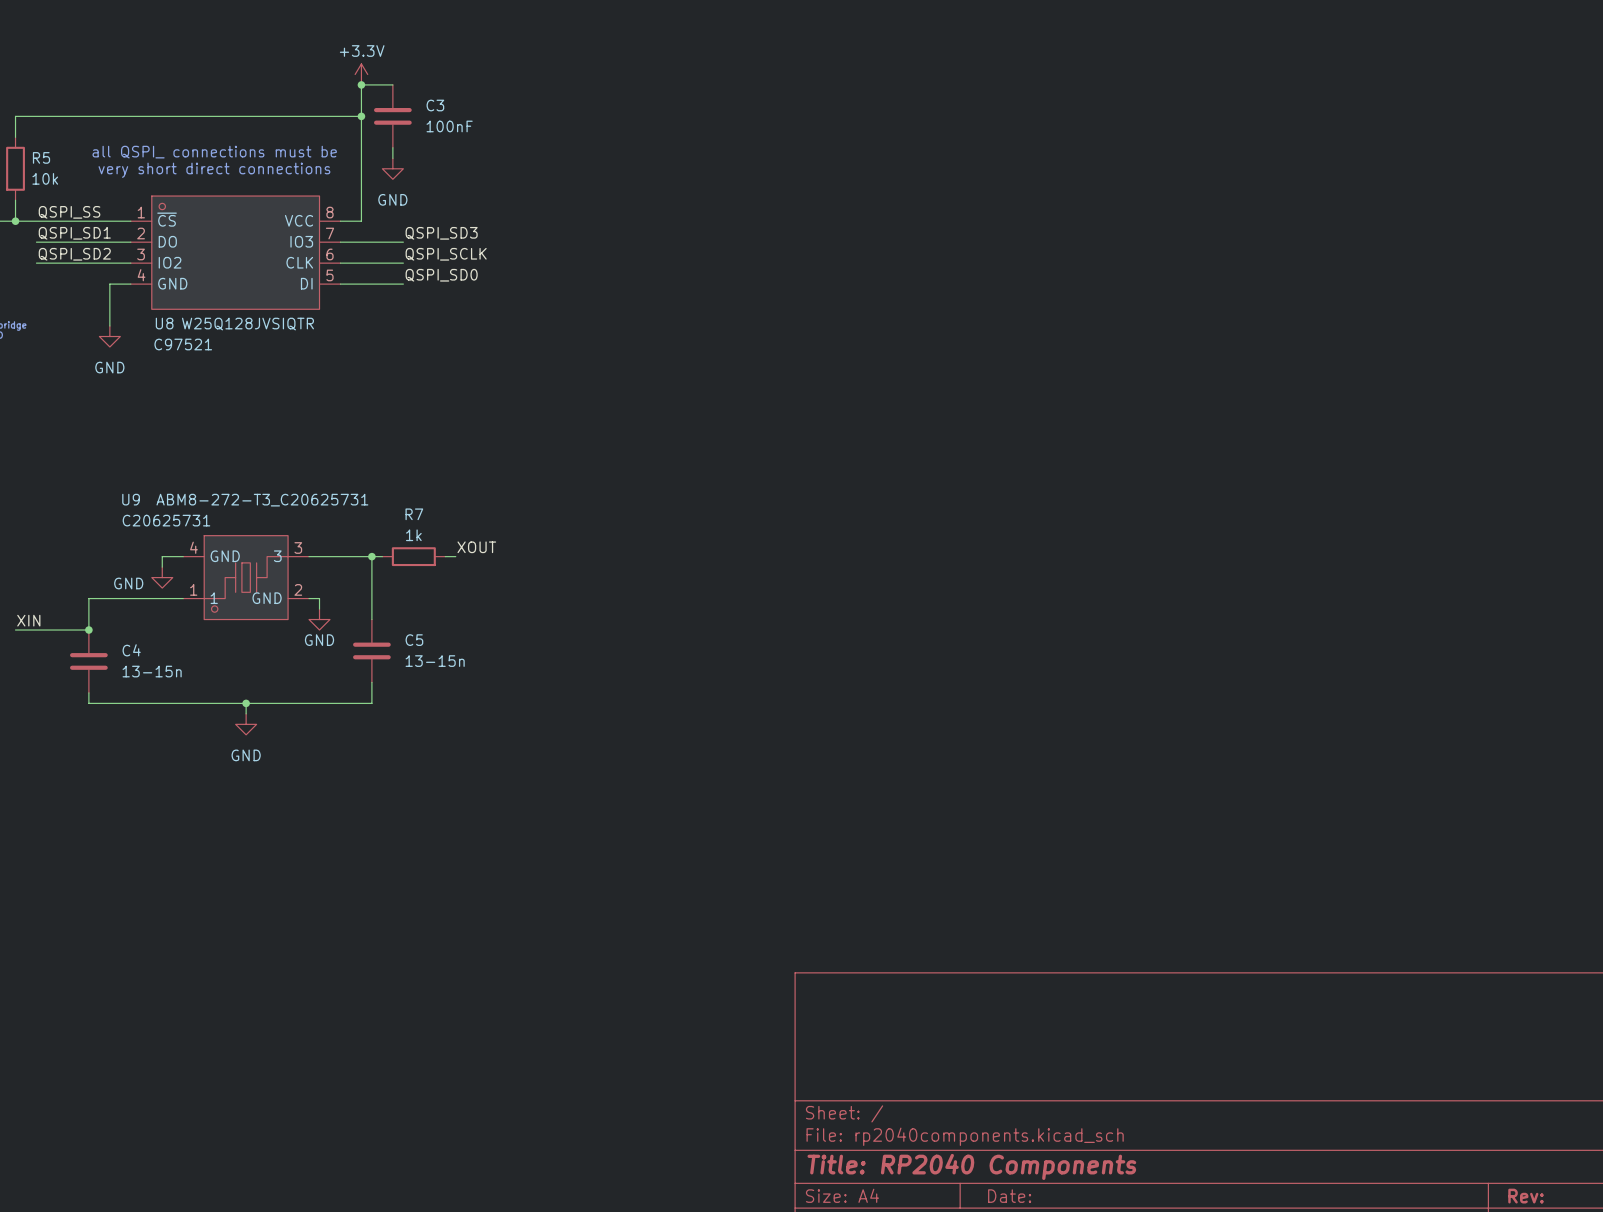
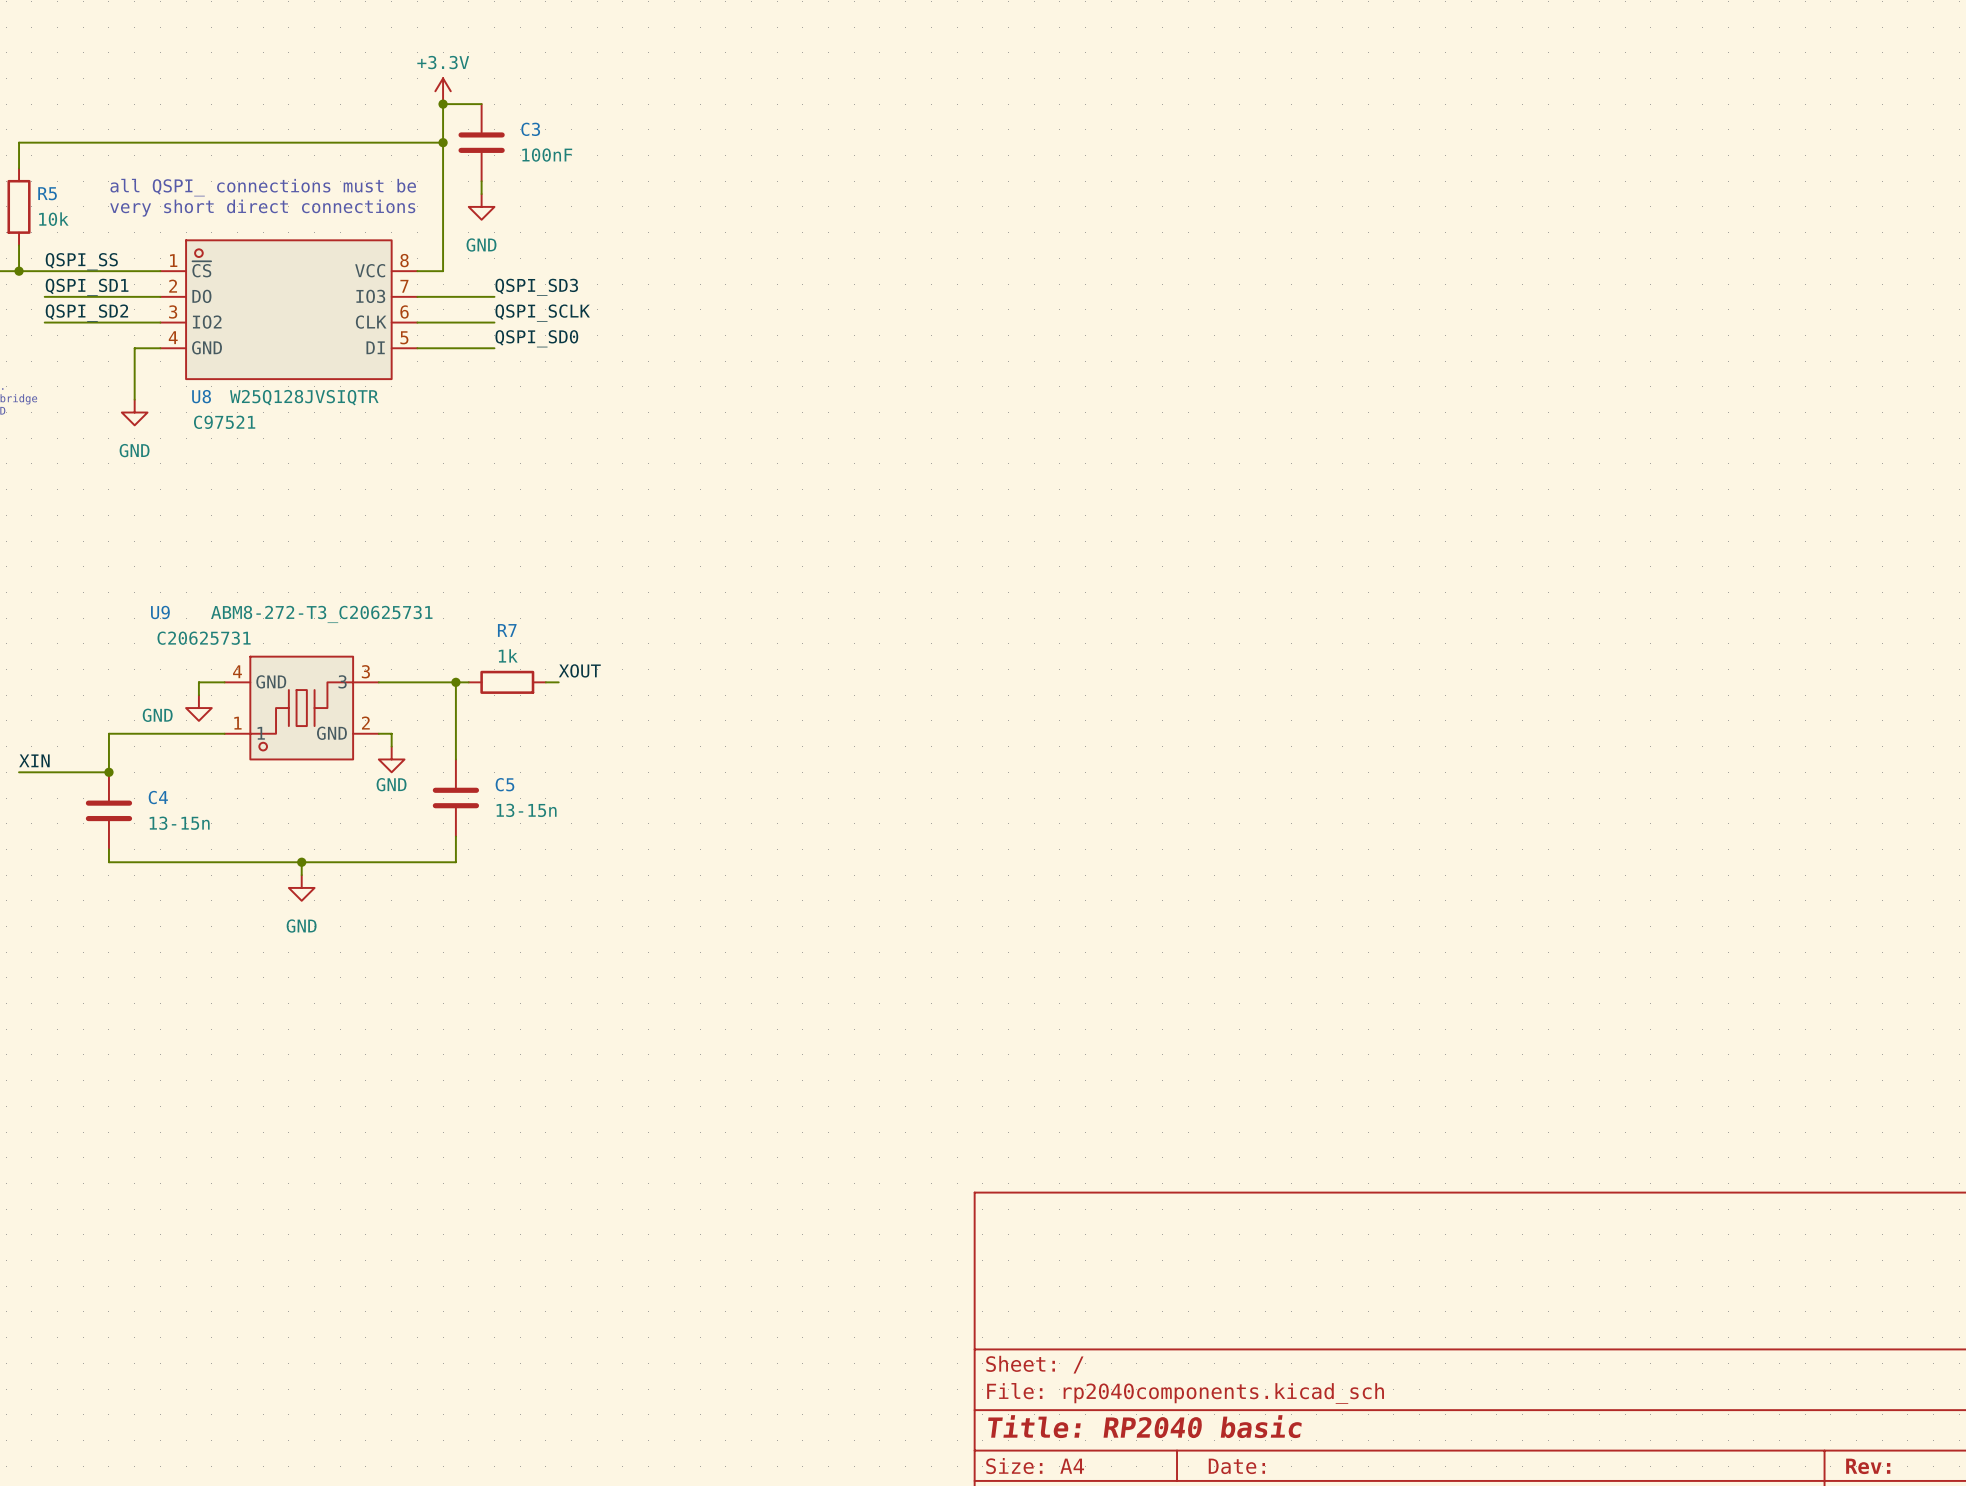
title block: Title: RP2040 Components (971, 1166) -> Title: RP2040 basic (1144, 1426)

